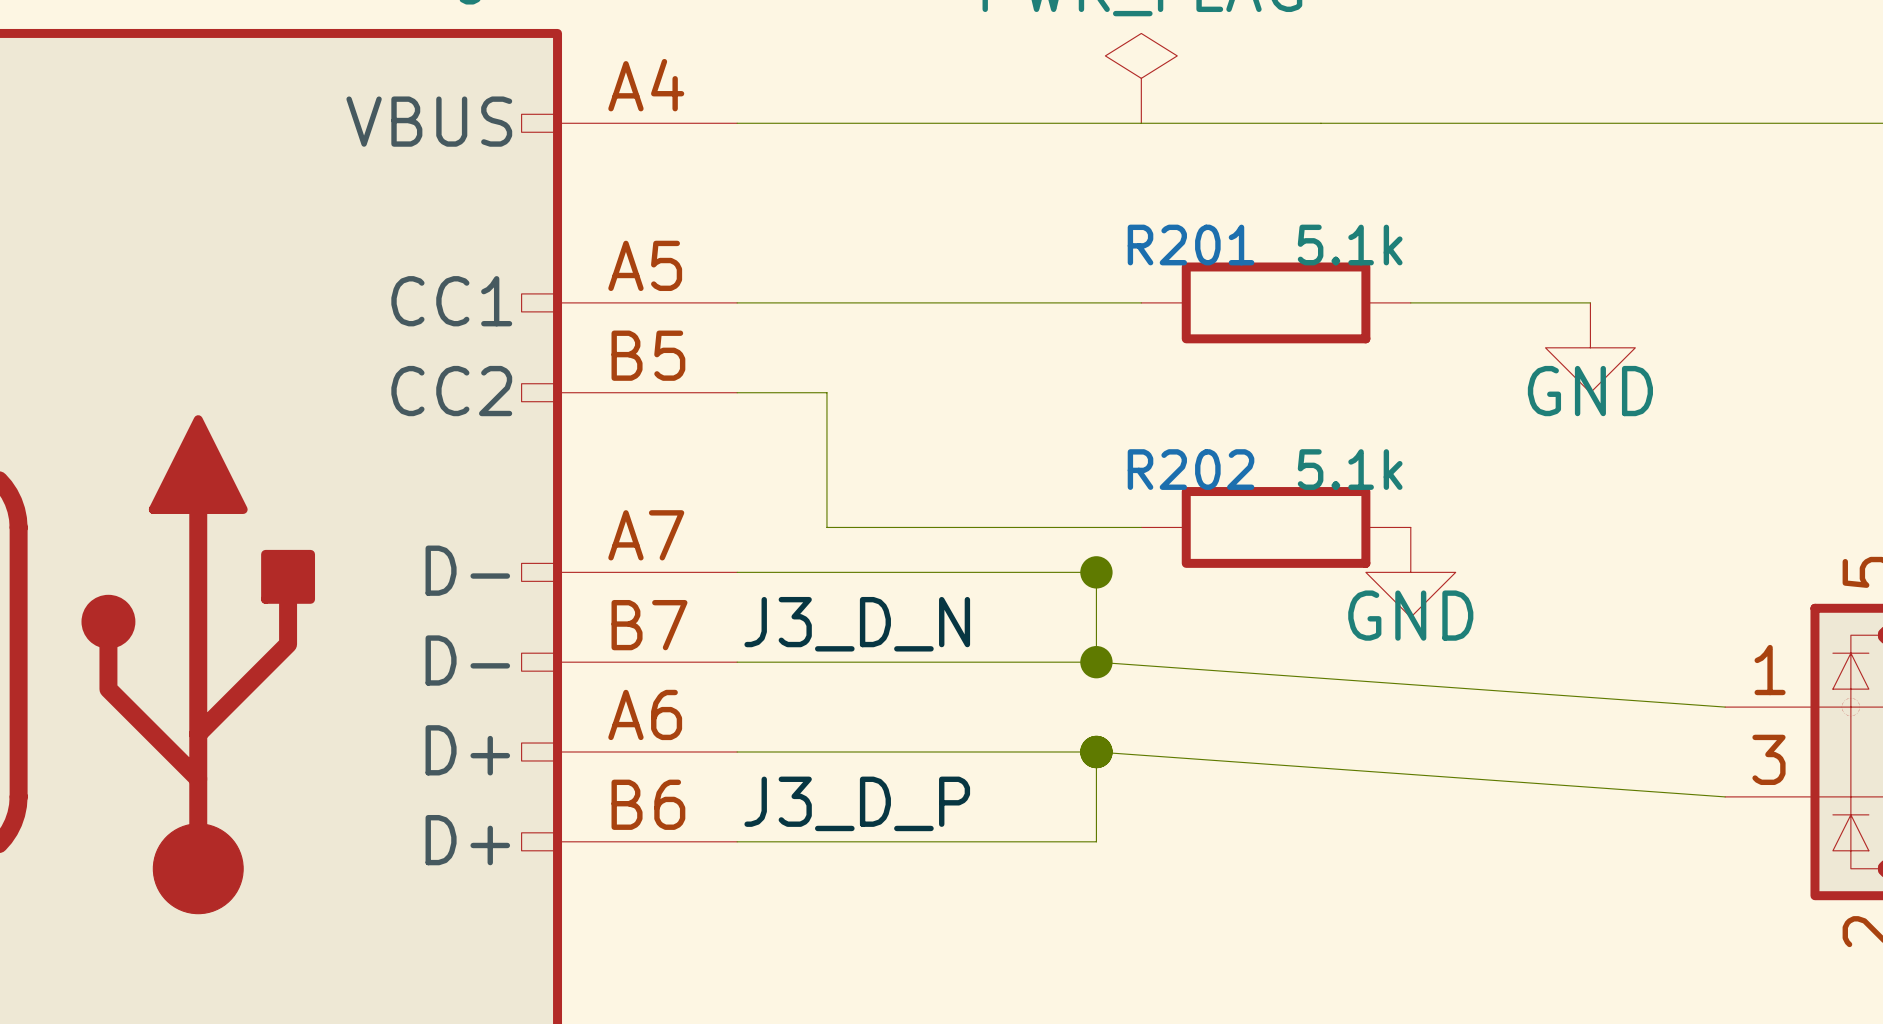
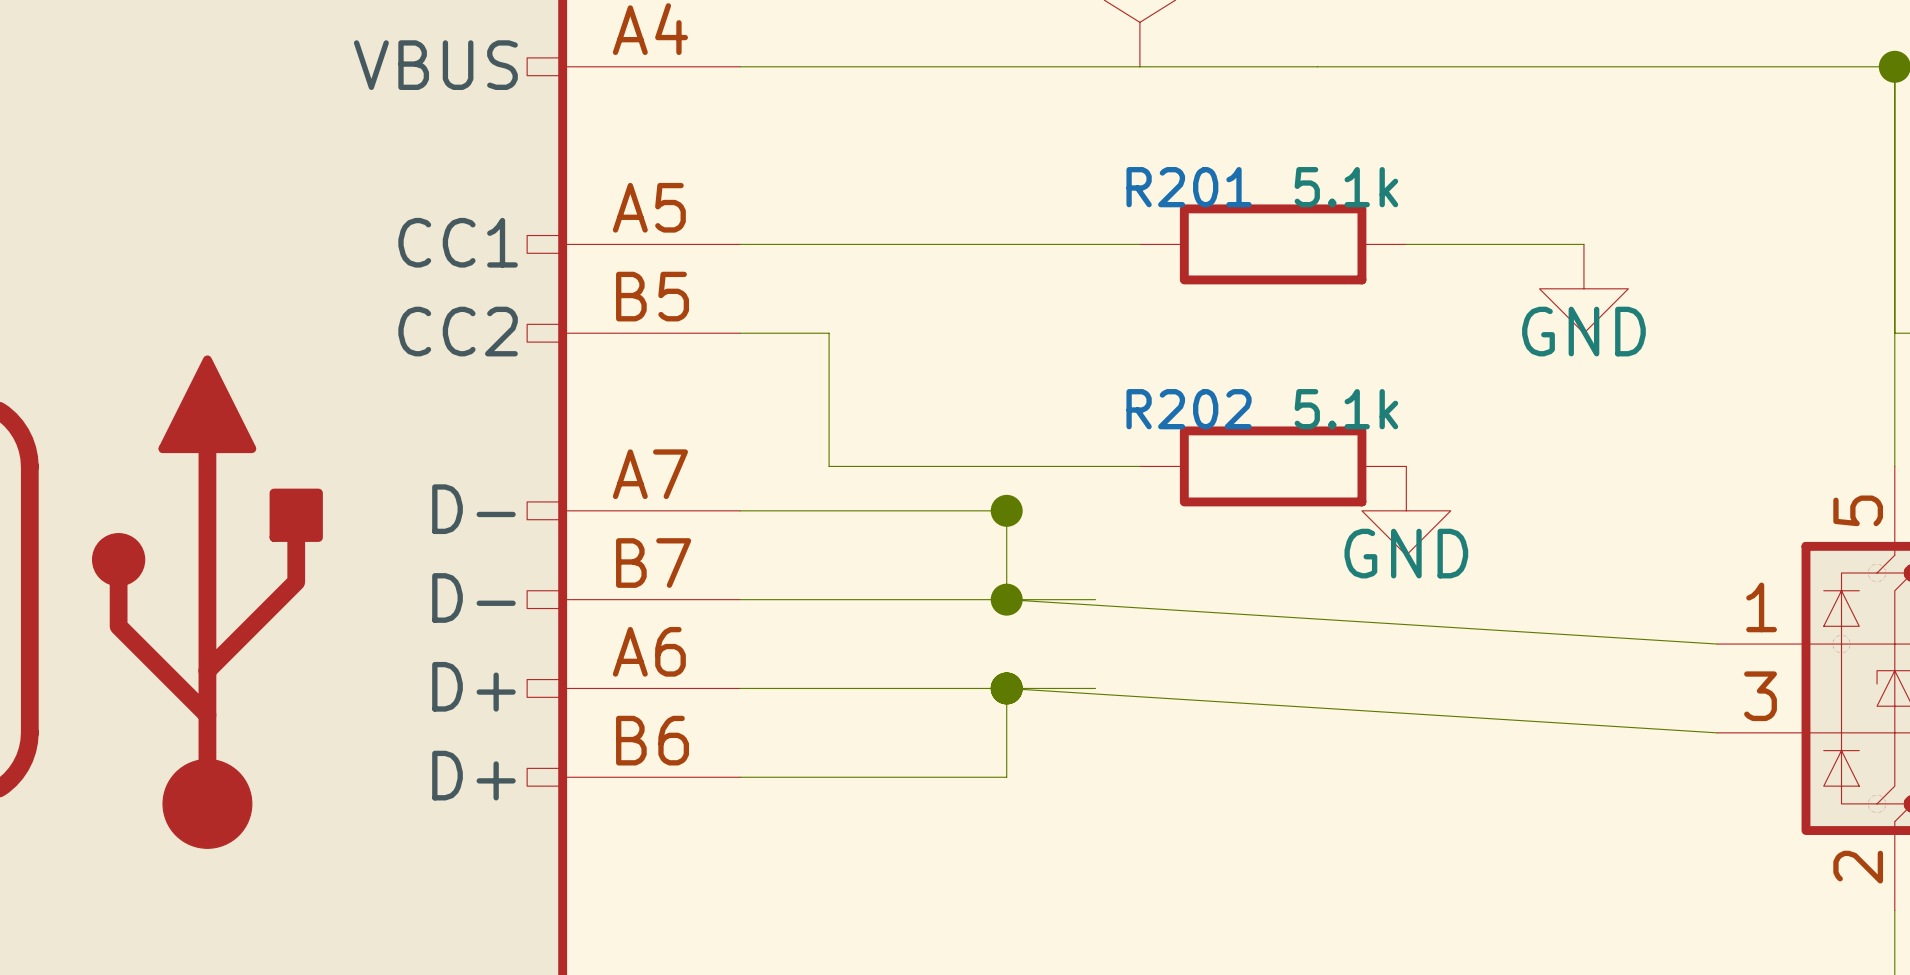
wire: (1006, 572) (1096, 572) (1096, 662) (1725, 707) -> (1006, 510) (1006, 599) (1717, 644)
junction: none -> (1006, 510)
junction: (1096, 572) -> none
label: J3_D_N (857, 624) -> none
junction: none -> (1006, 599)
junction: (1096, 662) -> none
junction: none -> (1006, 688)
junction: (1096, 751) -> none
wire: (1725, 796) (1096, 751) (1096, 841) (1006, 841) -> (1717, 732) (1006, 688) (1006, 777)
label: J3_D_P (857, 803) -> none

